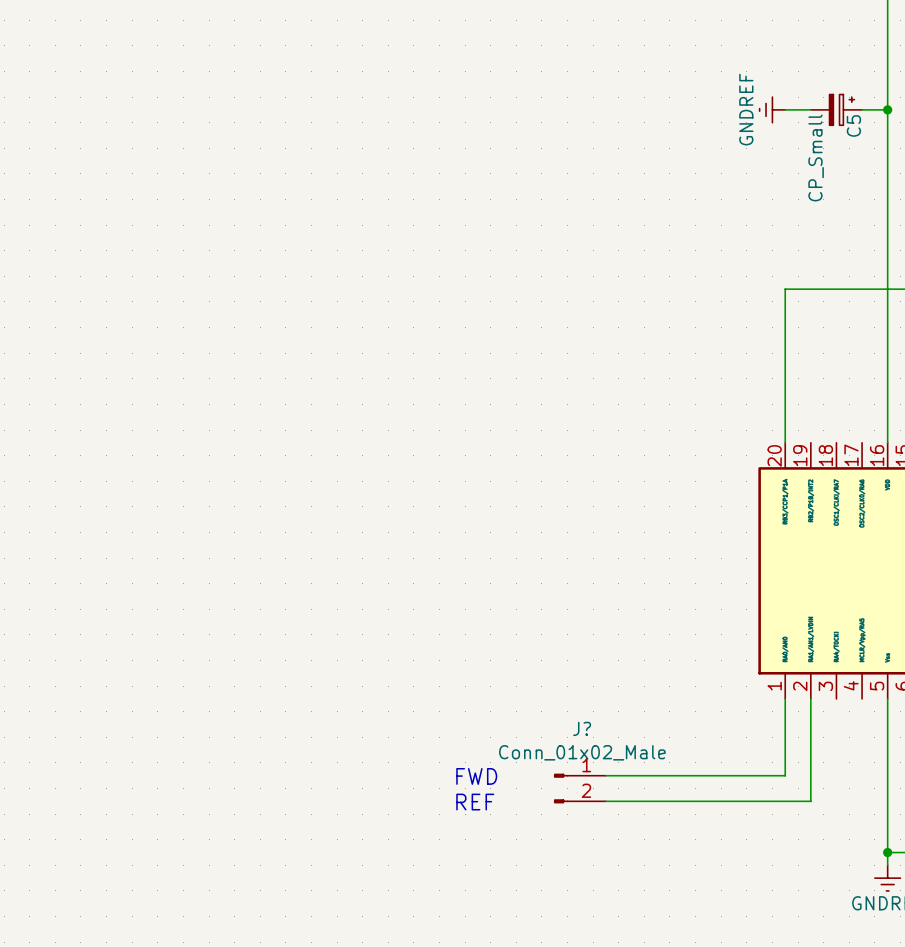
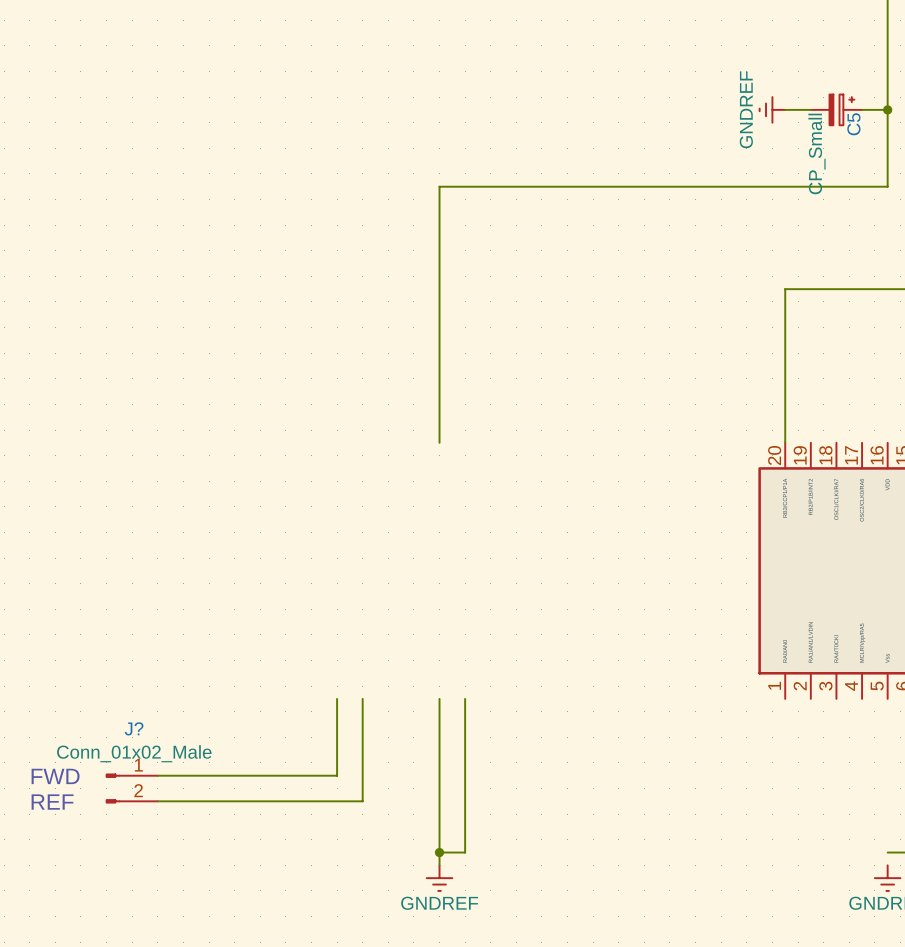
wire: (887, 186) (887, 442) -> (887, 186) (439, 186) (439, 442)
wire: none -> (337, 698) (337, 775) (157, 775)
wire: none -> (362, 698) (362, 801) (157, 801)
wire: none -> (439, 698) (439, 865)
wire: none -> (465, 698) (465, 852) (439, 852)
wire: (785, 698) (785, 775) (605, 775) -> none
wire: (810, 698) (810, 801) (605, 801) -> none
wire: (887, 698) (887, 865) -> none
text: none -> FWD (55, 776)
text: FWD (476, 776) -> none
J?: none -> Conn_01x02_Male (131, 788)
J?: Conn_01x02_Male (579, 788) -> none
text: none -> REF (52, 802)
text: REF (475, 802) -> none
junction: none -> (439, 852)
junction: (887, 852) -> none
power symbol: none -> GNDREF (439, 878)

